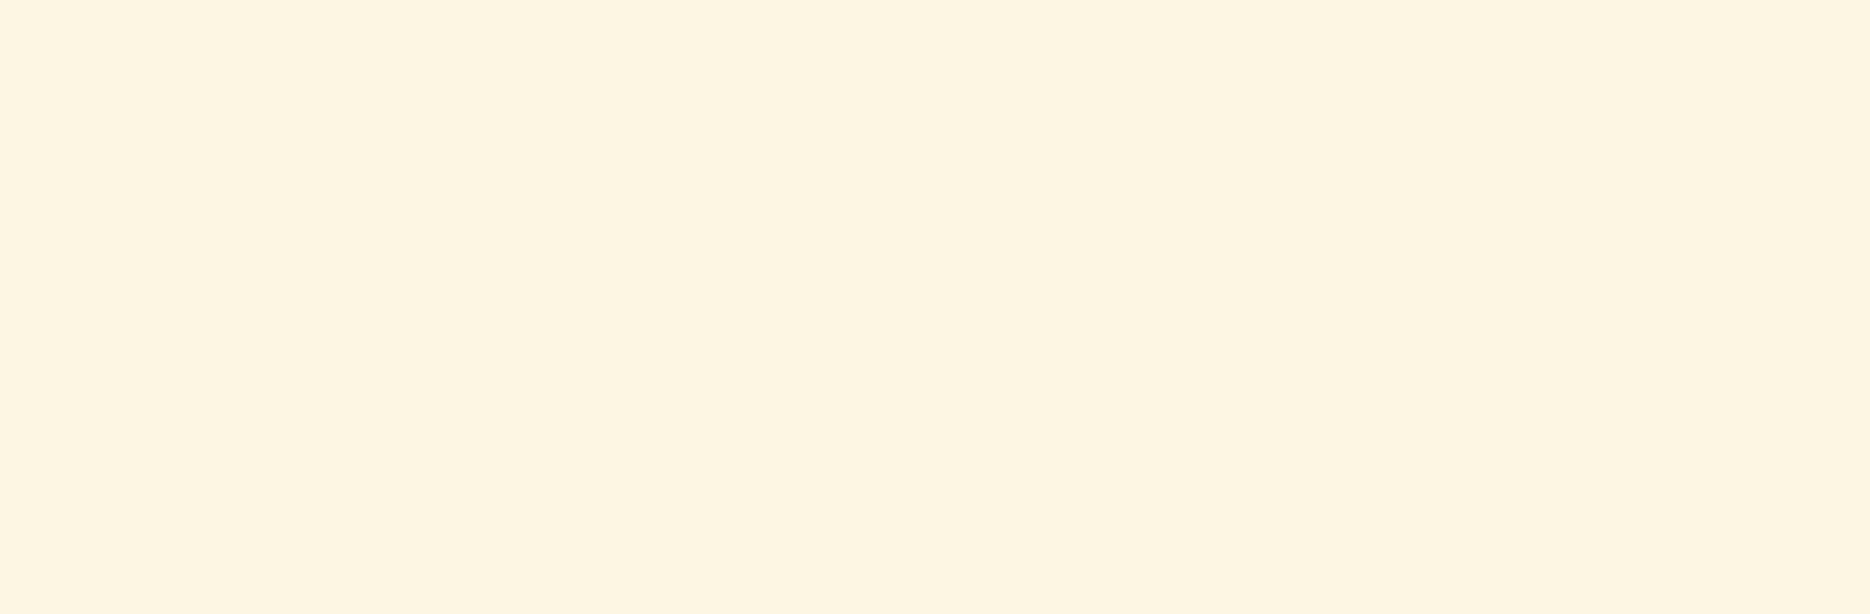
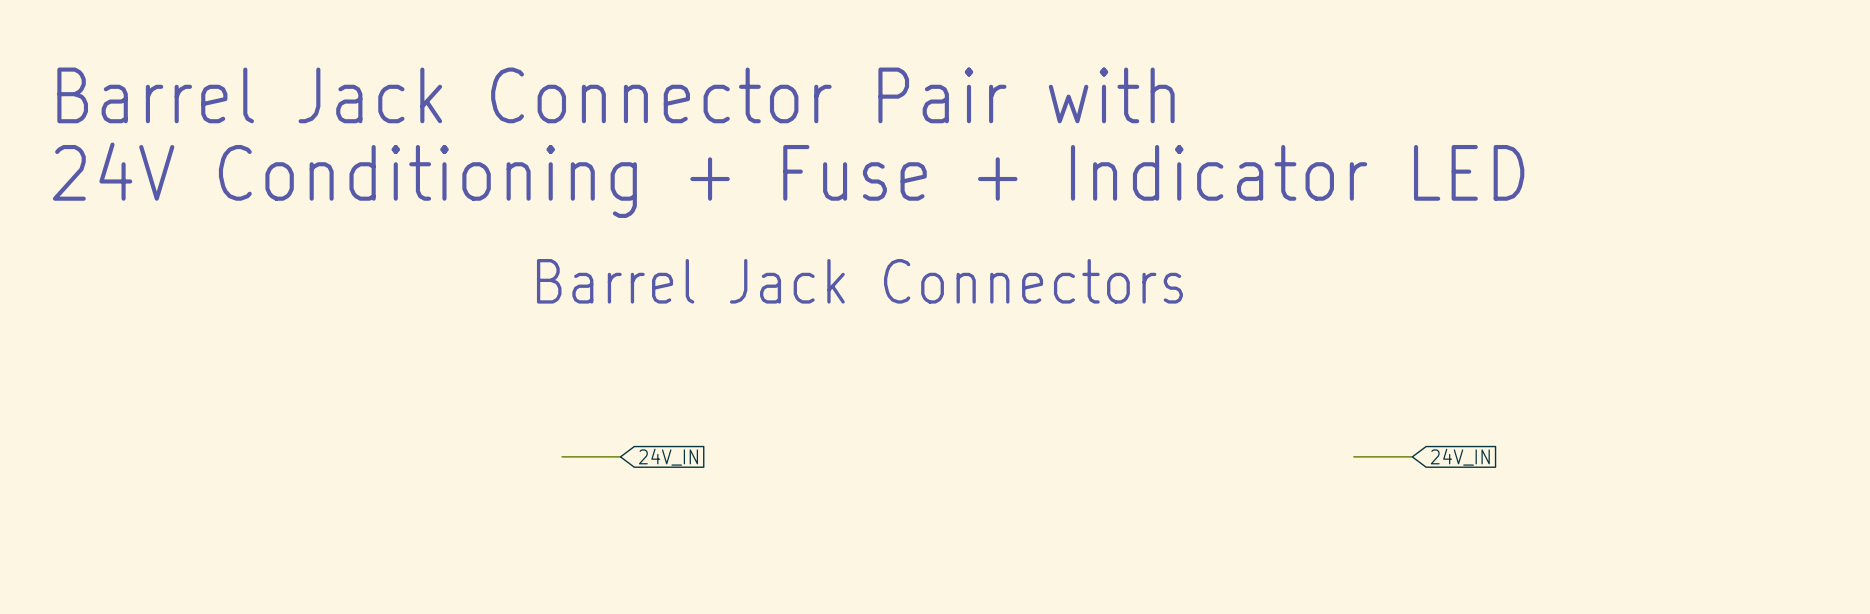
text: none -> Barrel Jack Connector Pair with (615, 95)
text: none -> 24V Conditioning + Fuse + Indicator LED (788, 180)
text: none -> Barrel Jack Connectors (859, 281)
wire: none -> (562, 456) (620, 456)
wire: none -> (1353, 456) (1412, 456)
global label: none -> 24V_IN (668, 457)
global label: none -> 24V_IN (1460, 457)

